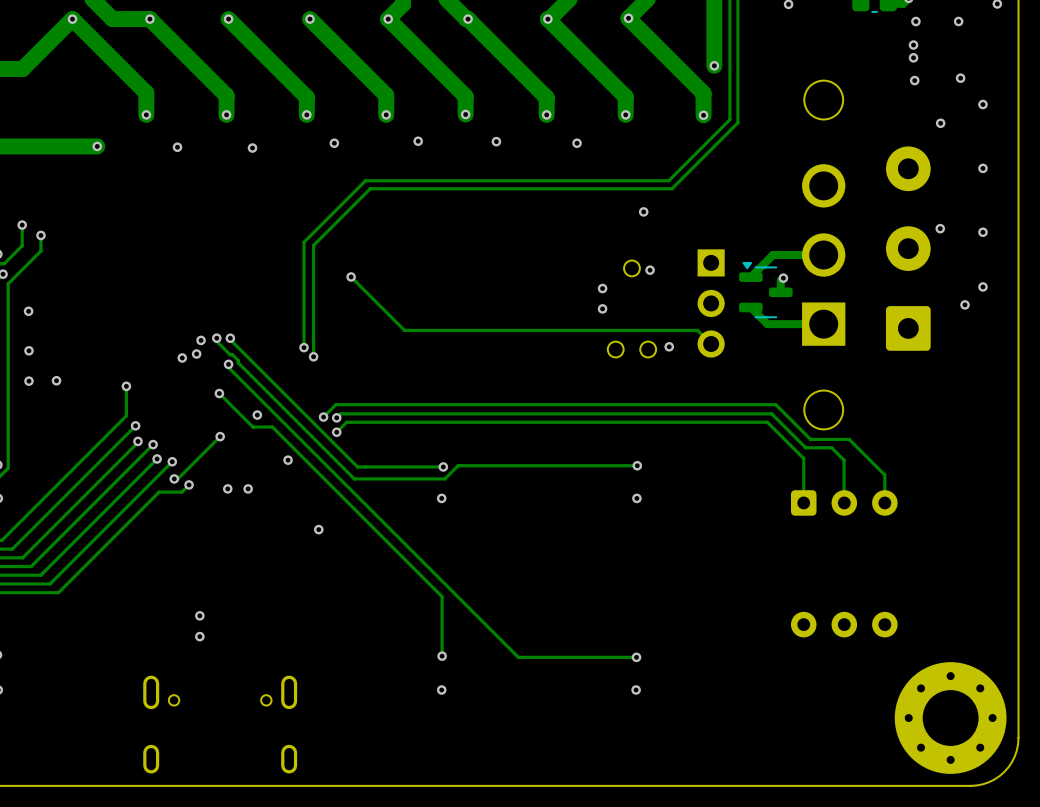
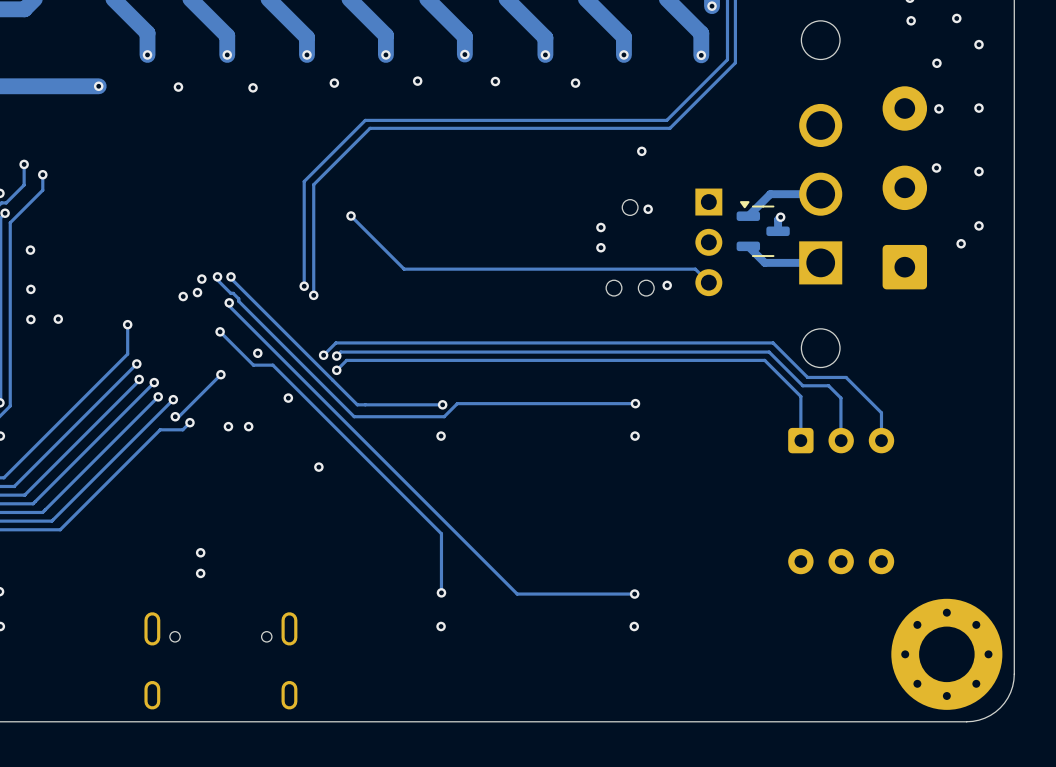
via: none -> (938, 108)

